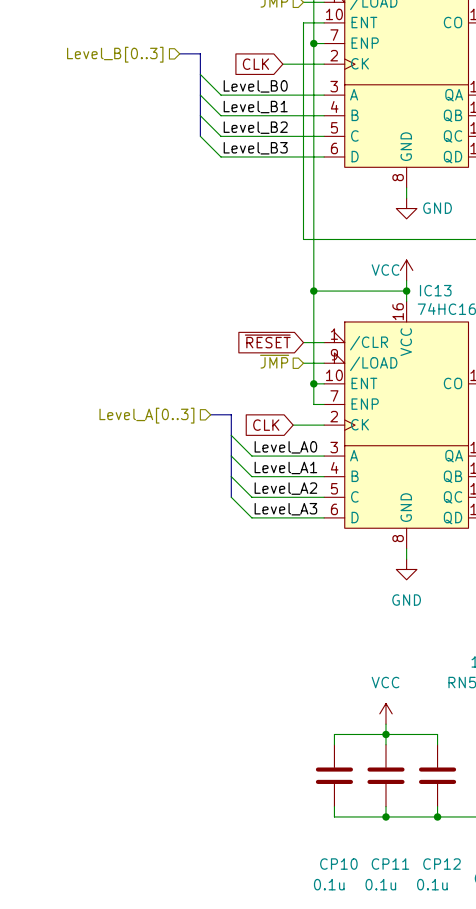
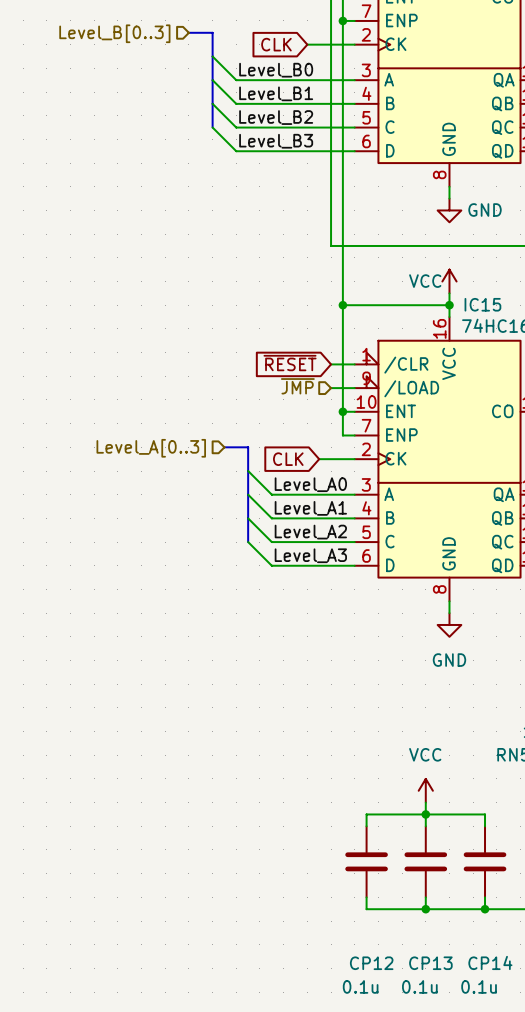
IC13 name: IC13 (435, 290) -> IC15 (482, 304)
CP10 name: CP10 (338, 864) -> CP12 (371, 963)
CP11 name: CP11 (390, 864) -> CP13 (430, 963)
CP12 name: CP12 (442, 864) -> CP14 (490, 962)

